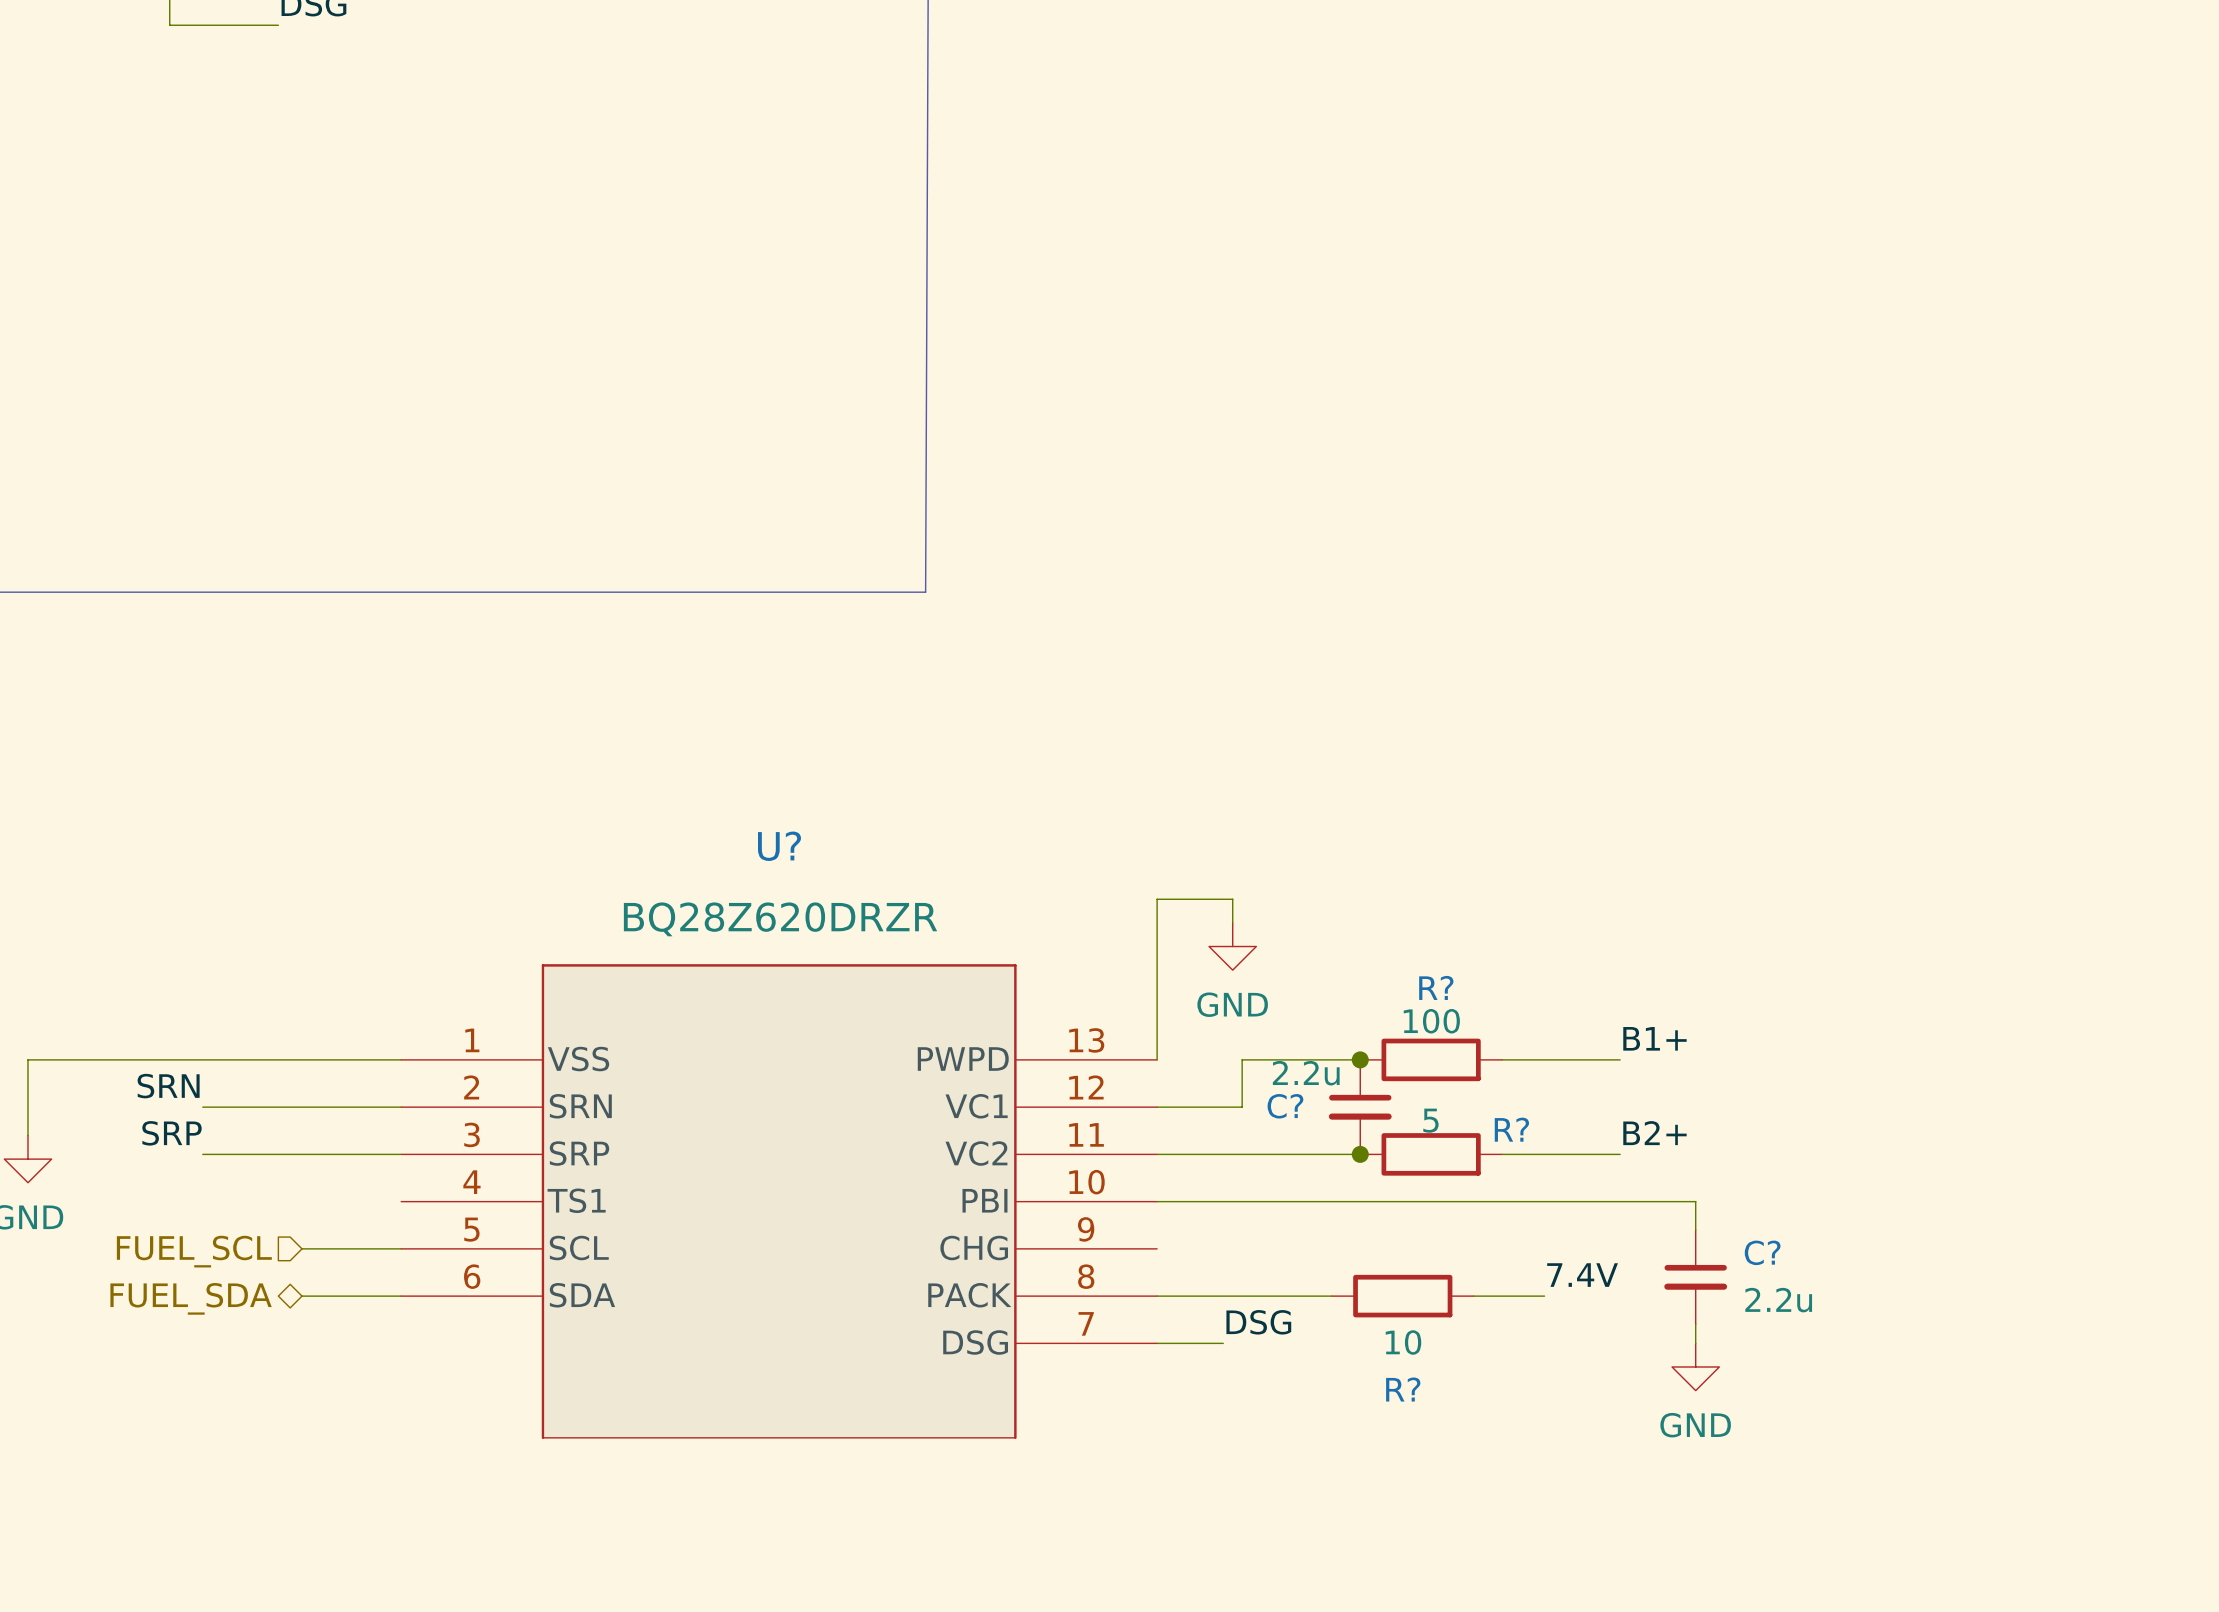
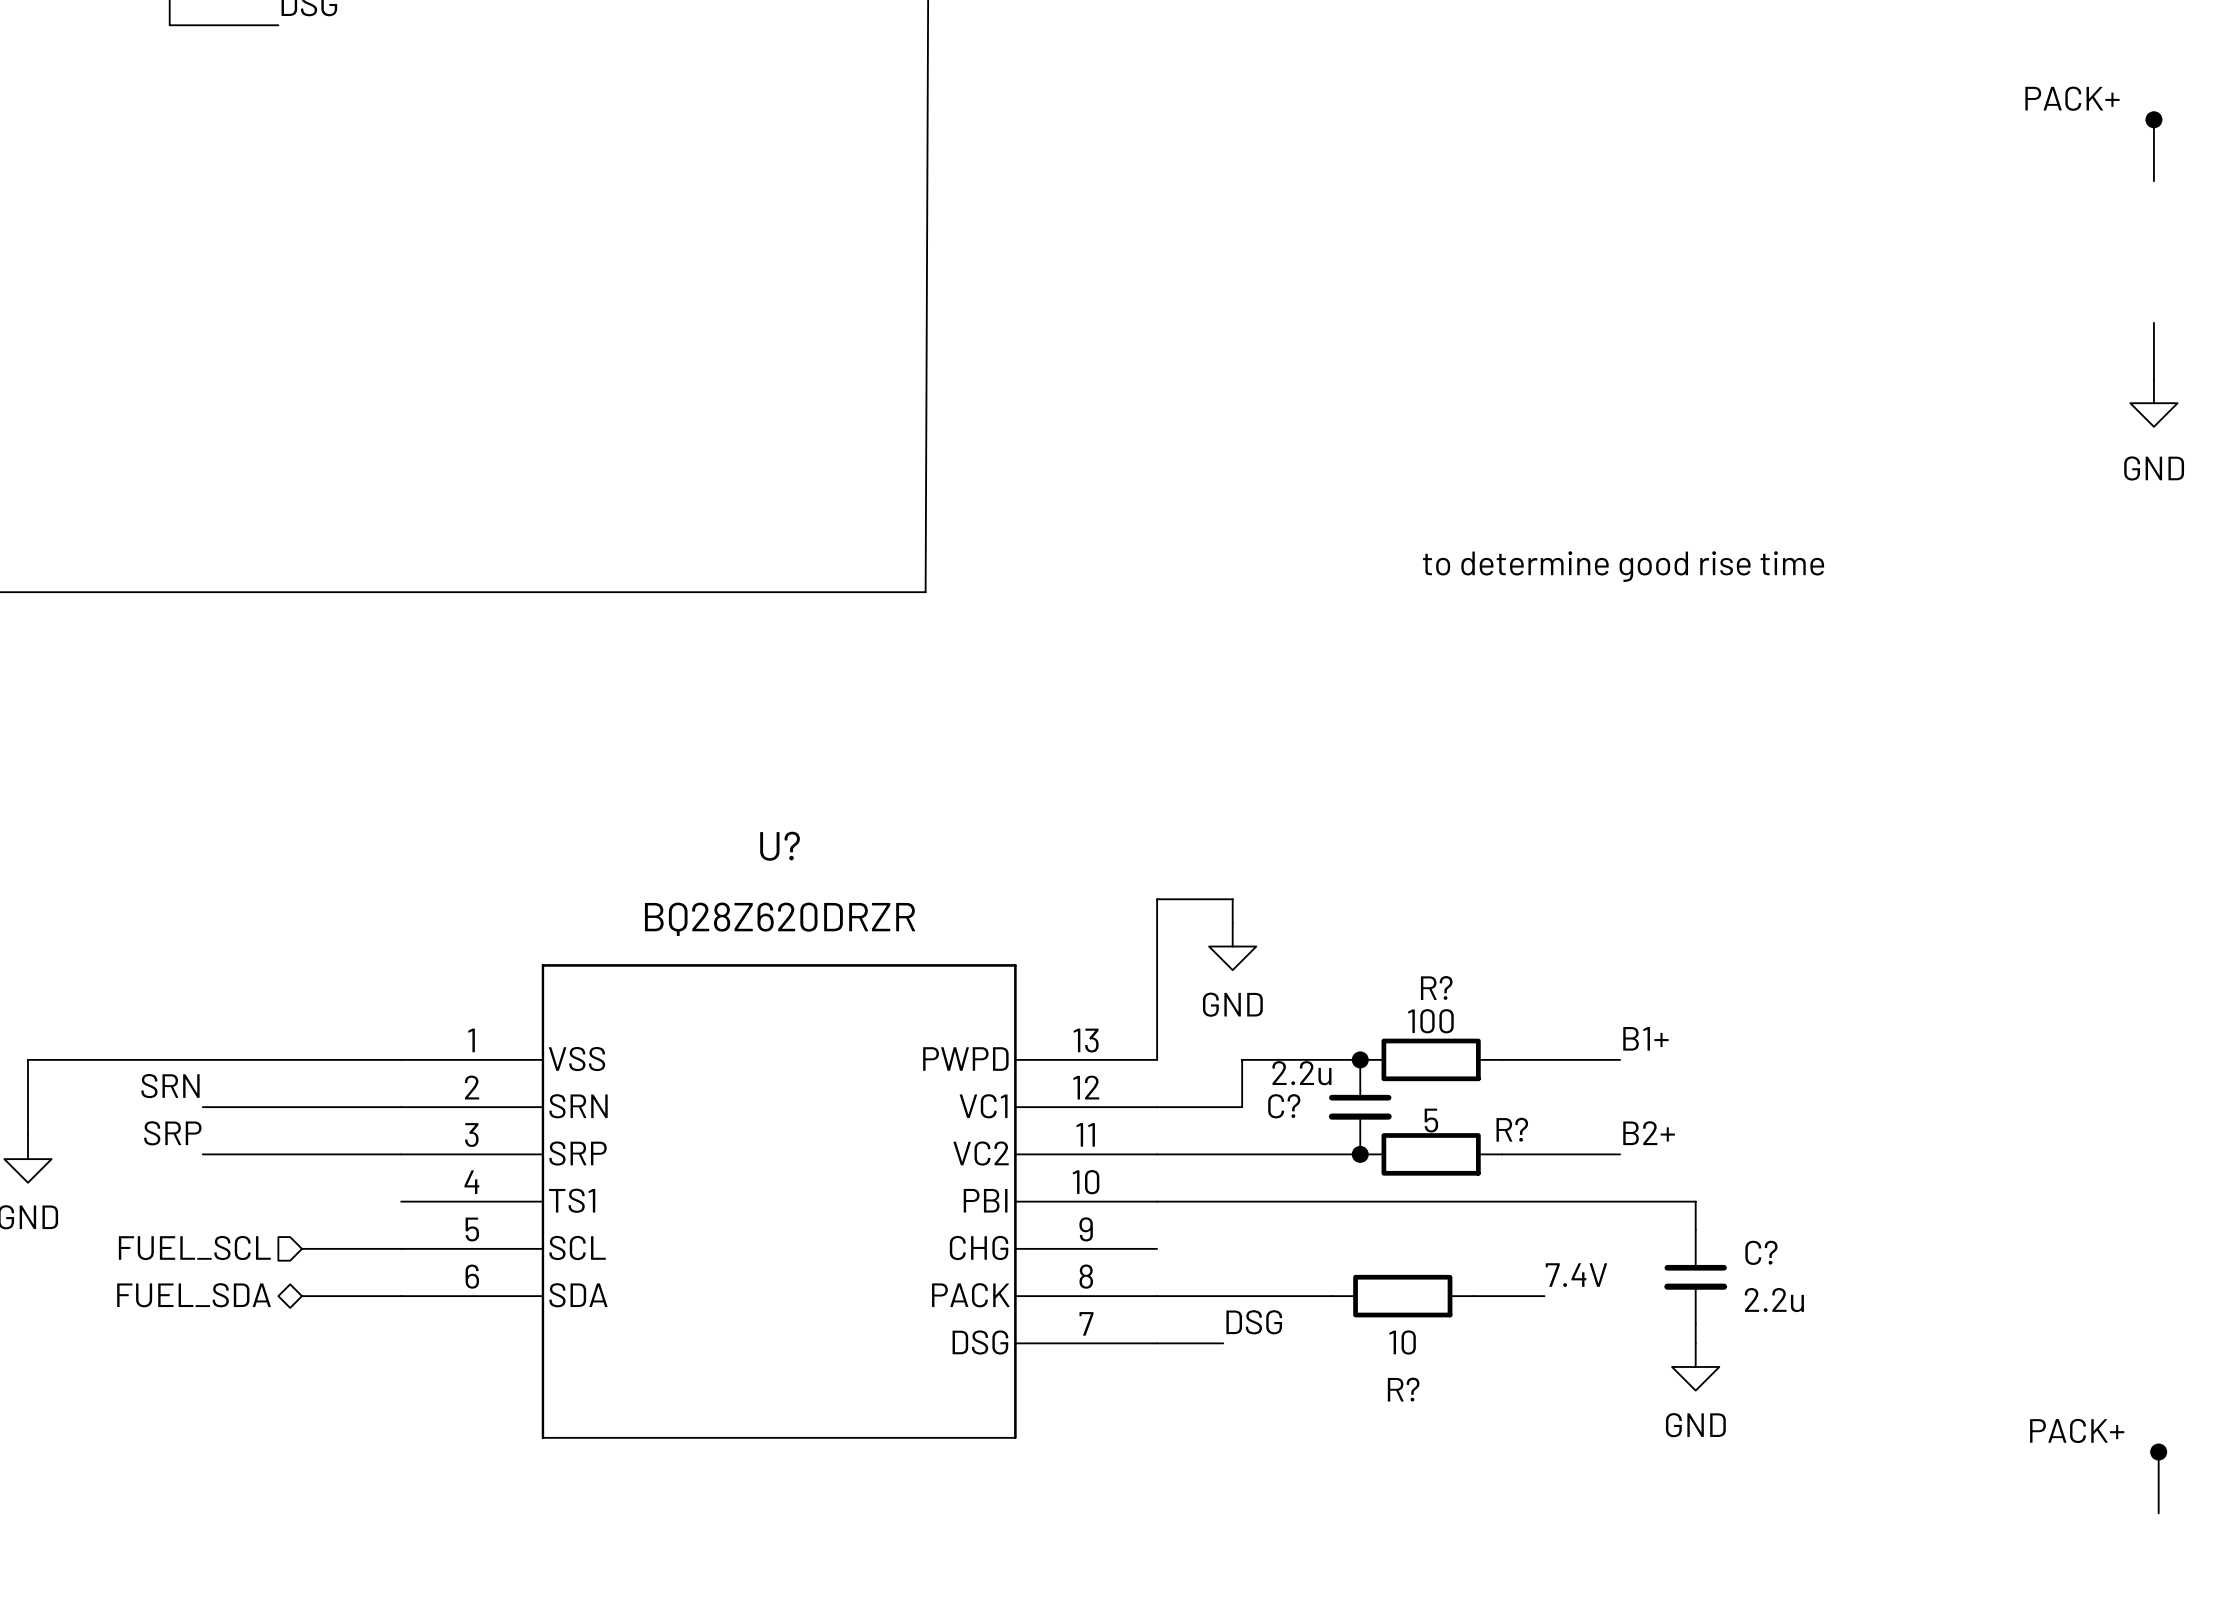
label: none -> PACK+ (2072, 98)
wire: none -> (2153, 119) (2153, 181)
junction: none -> (2153, 119)
wire: none -> (2153, 322) (2153, 379)
power symbol: none -> GND (2153, 403)
text: none -> to determine good rise time (1623, 566)
label: none -> PACK+ (2077, 1430)
wire: none -> (2158, 1452) (2158, 1513)
junction: none -> (2158, 1452)

